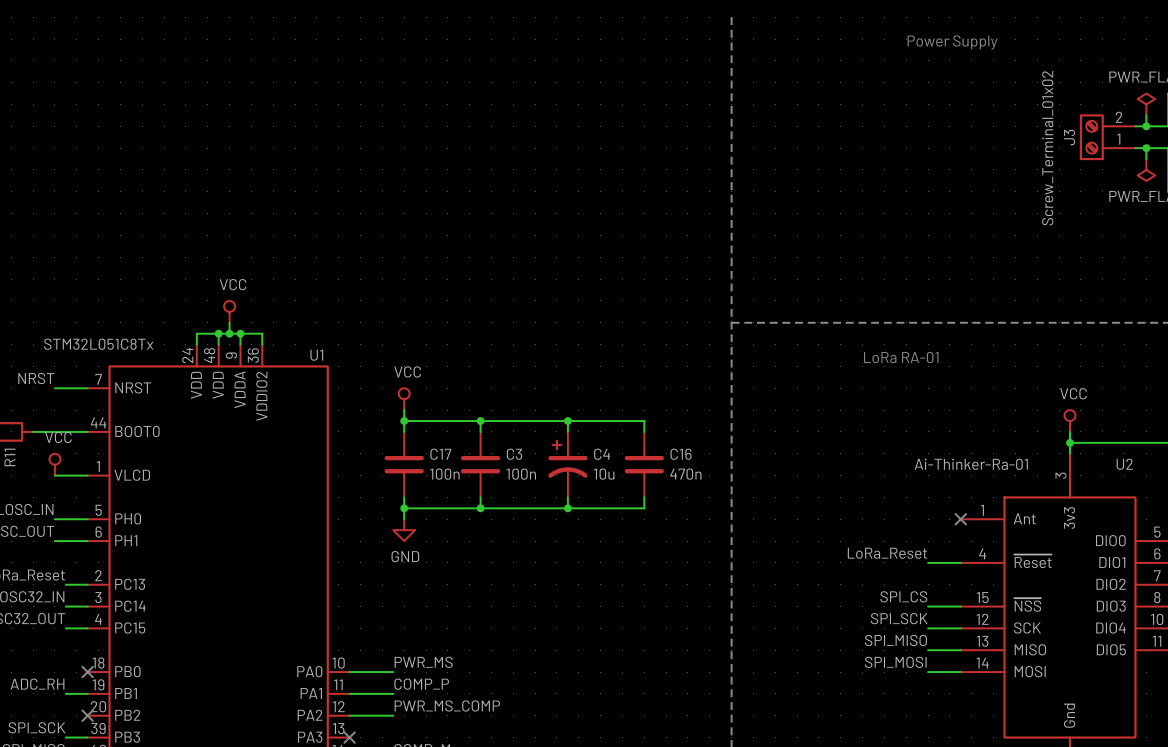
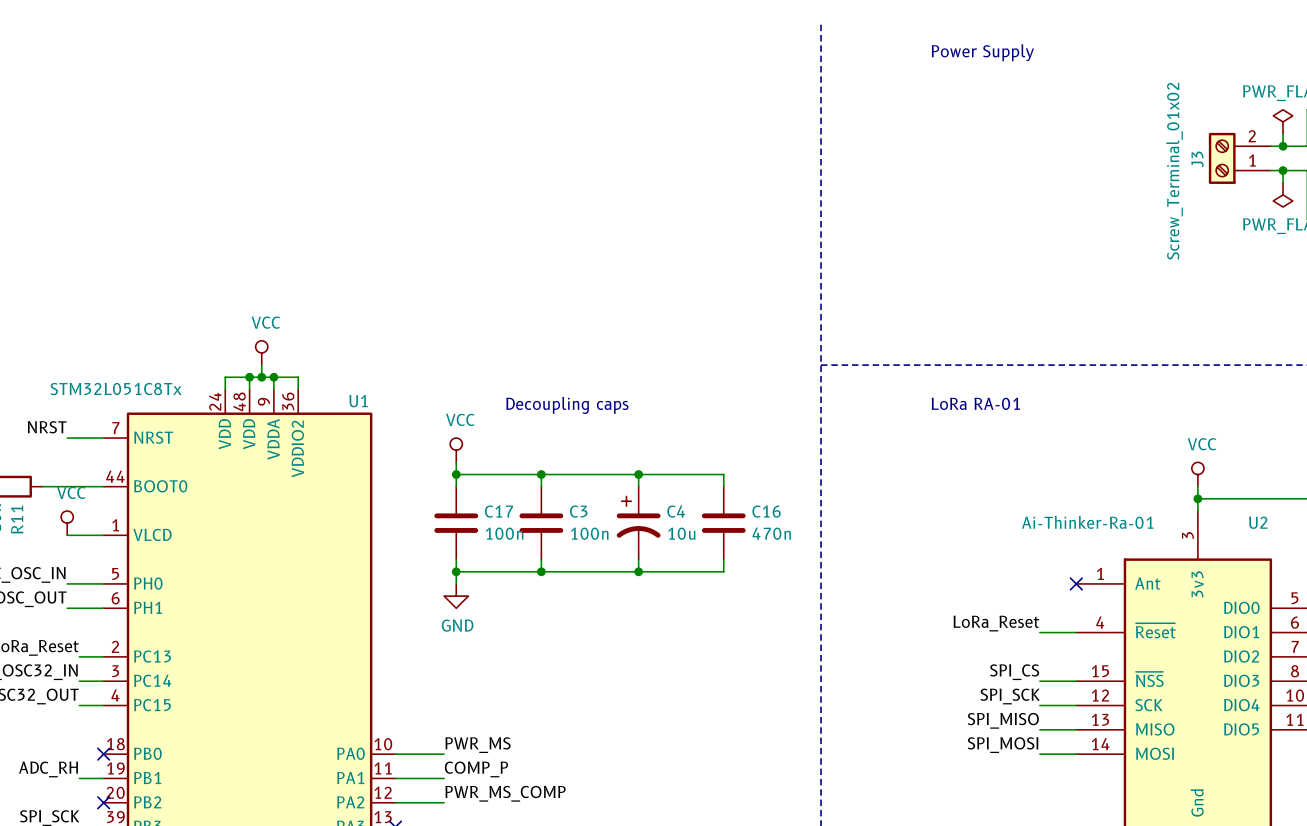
text position: Power Supply (952, 42) -> Power Supply (982, 52)
text position: LoRa RA-01 (901, 357) -> LoRa RA-01 (975, 403)
text: none -> Decoupling caps (567, 405)

